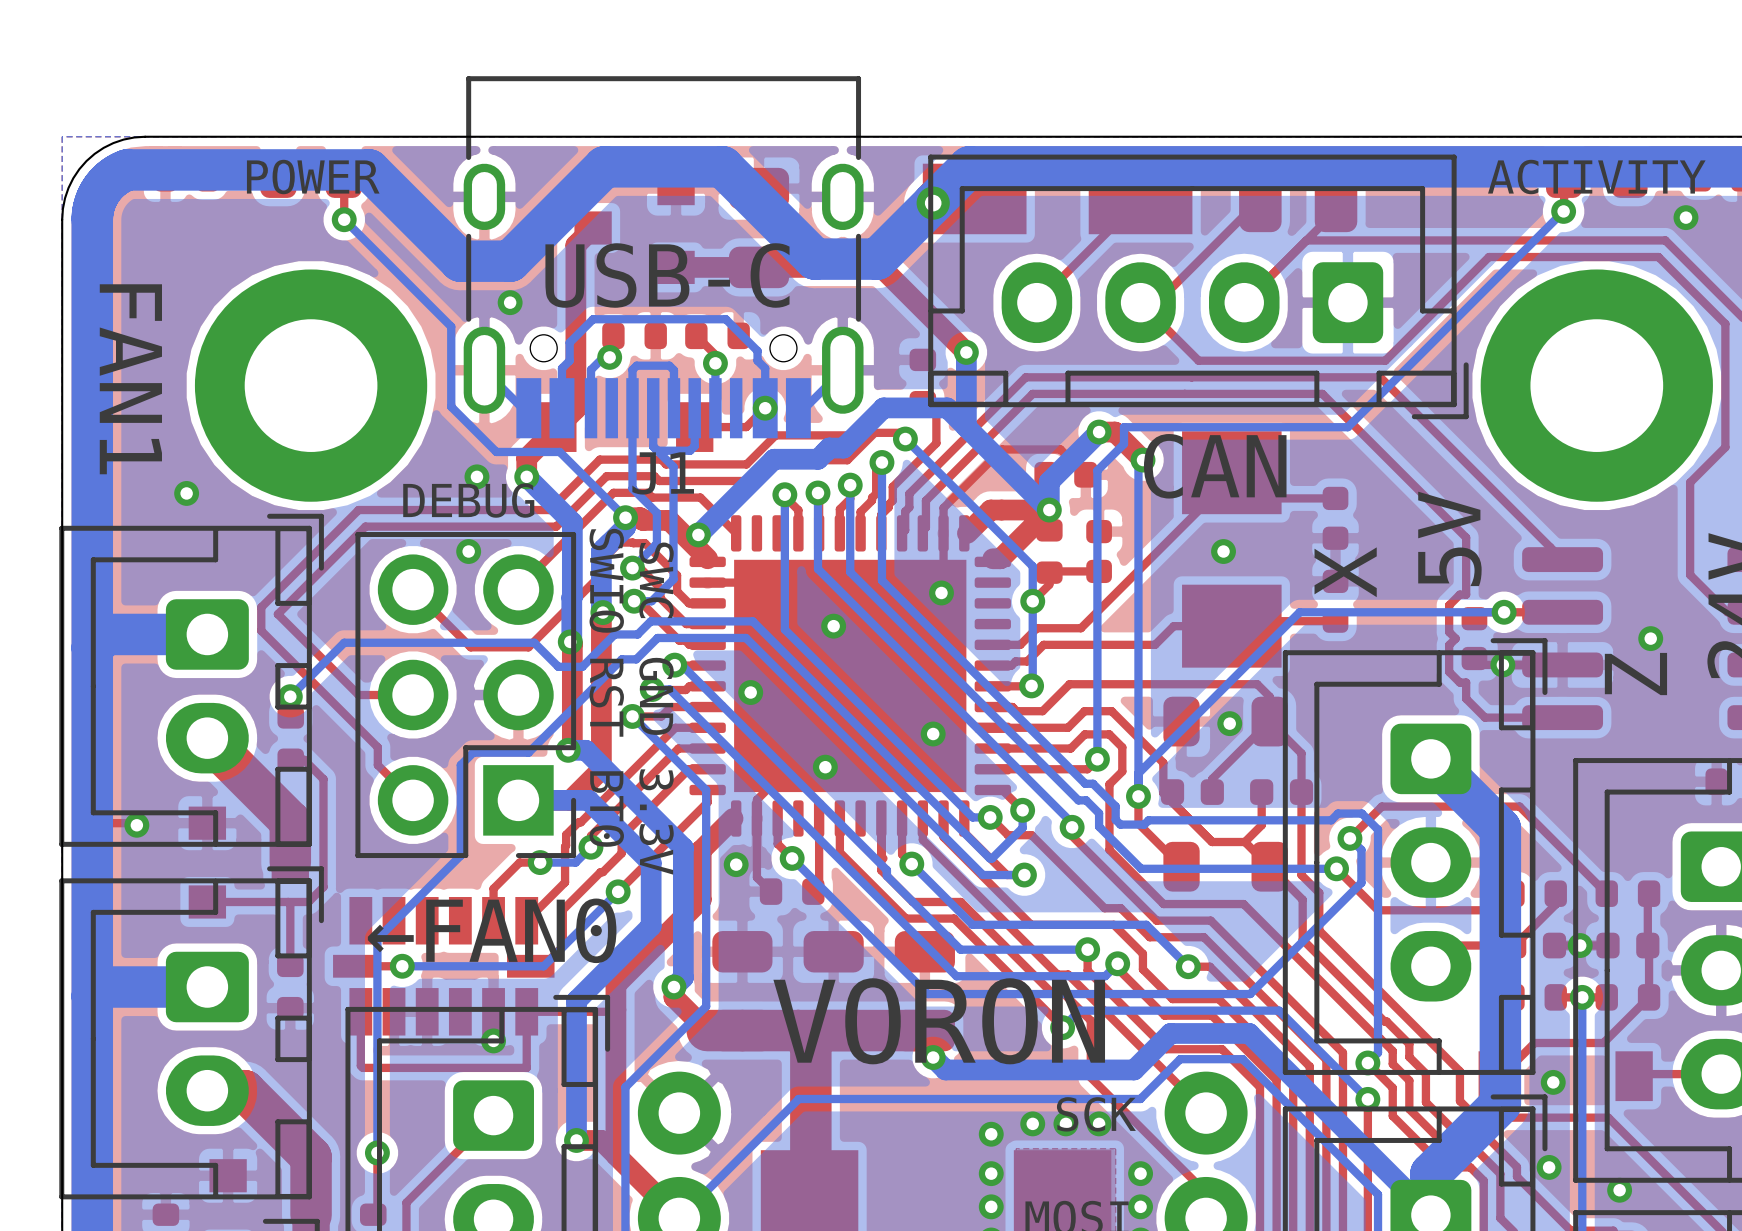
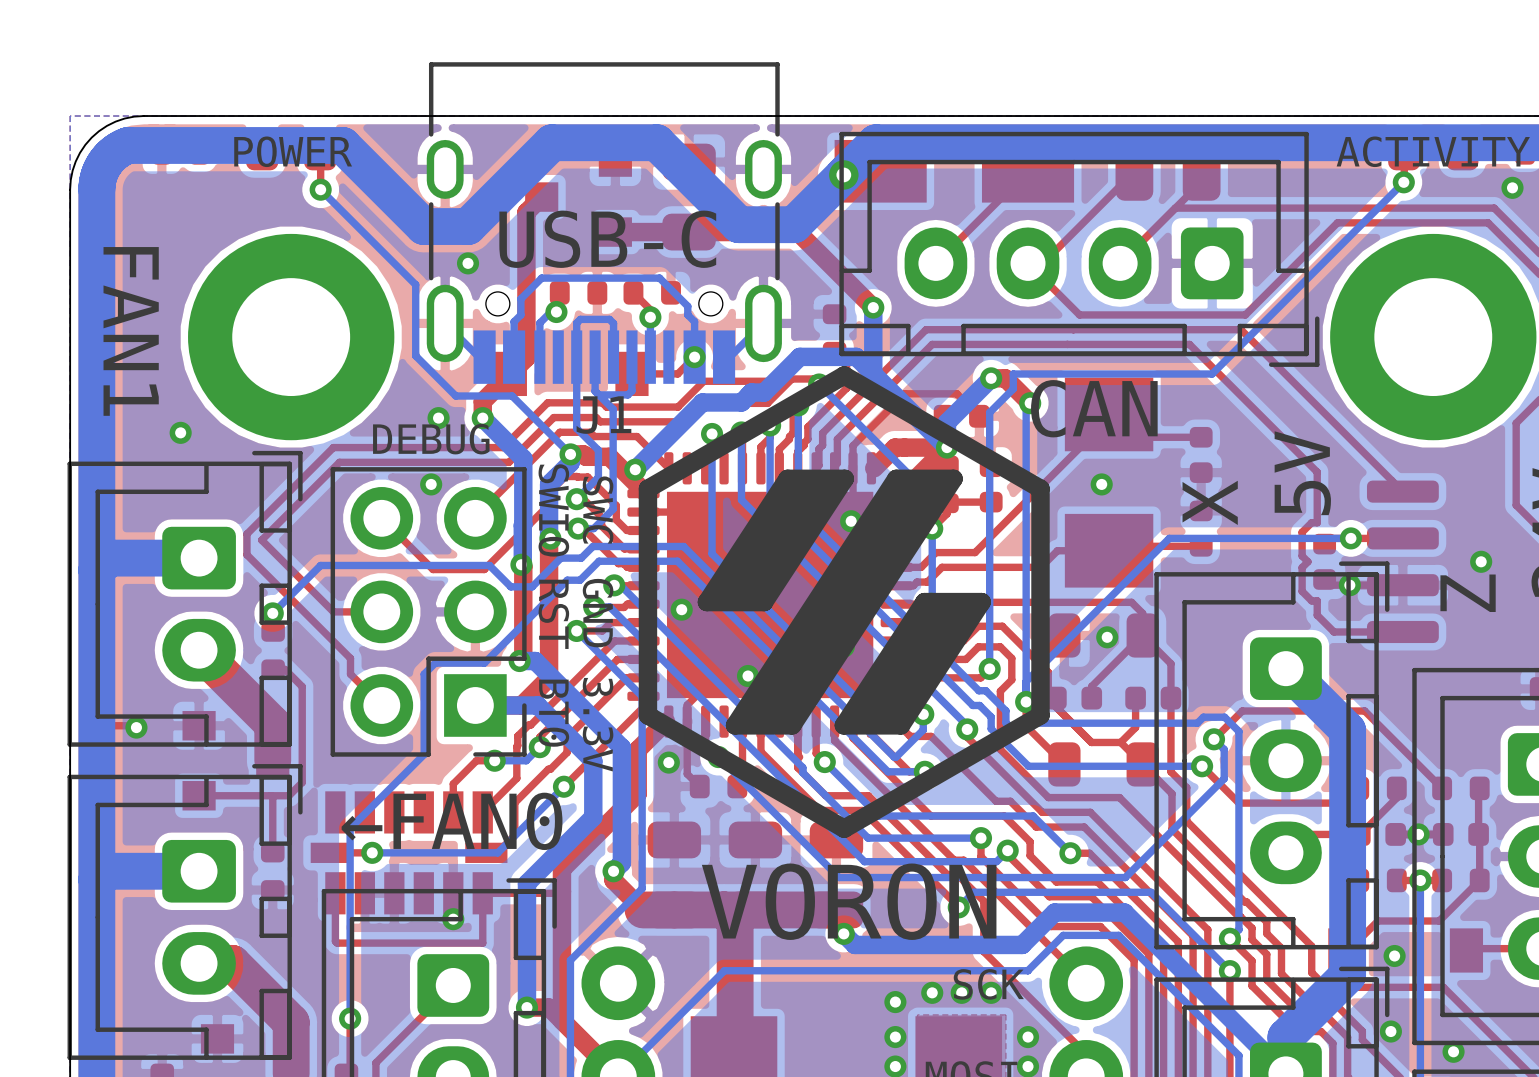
drawing: none -> [638, 366, 1050, 838]

